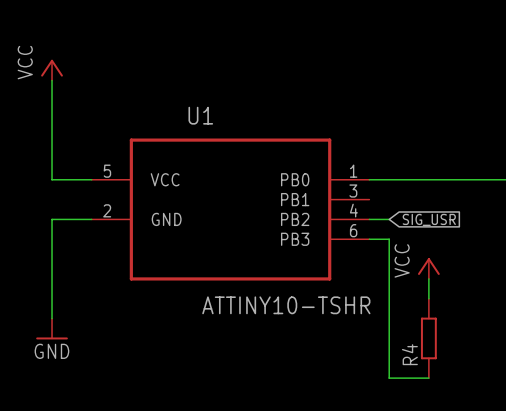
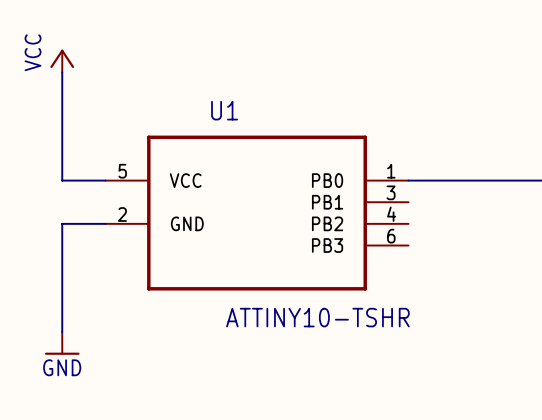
wire: (369, 219) (389, 219) -> none
global label: SIG_USR (429, 219) -> none
wire: (369, 239) (389, 239) (389, 378) (428, 378) -> none
power symbol: VCC (428, 268) -> none
wire: (428, 278) (428, 298) -> none
R4: (428, 338) -> none

